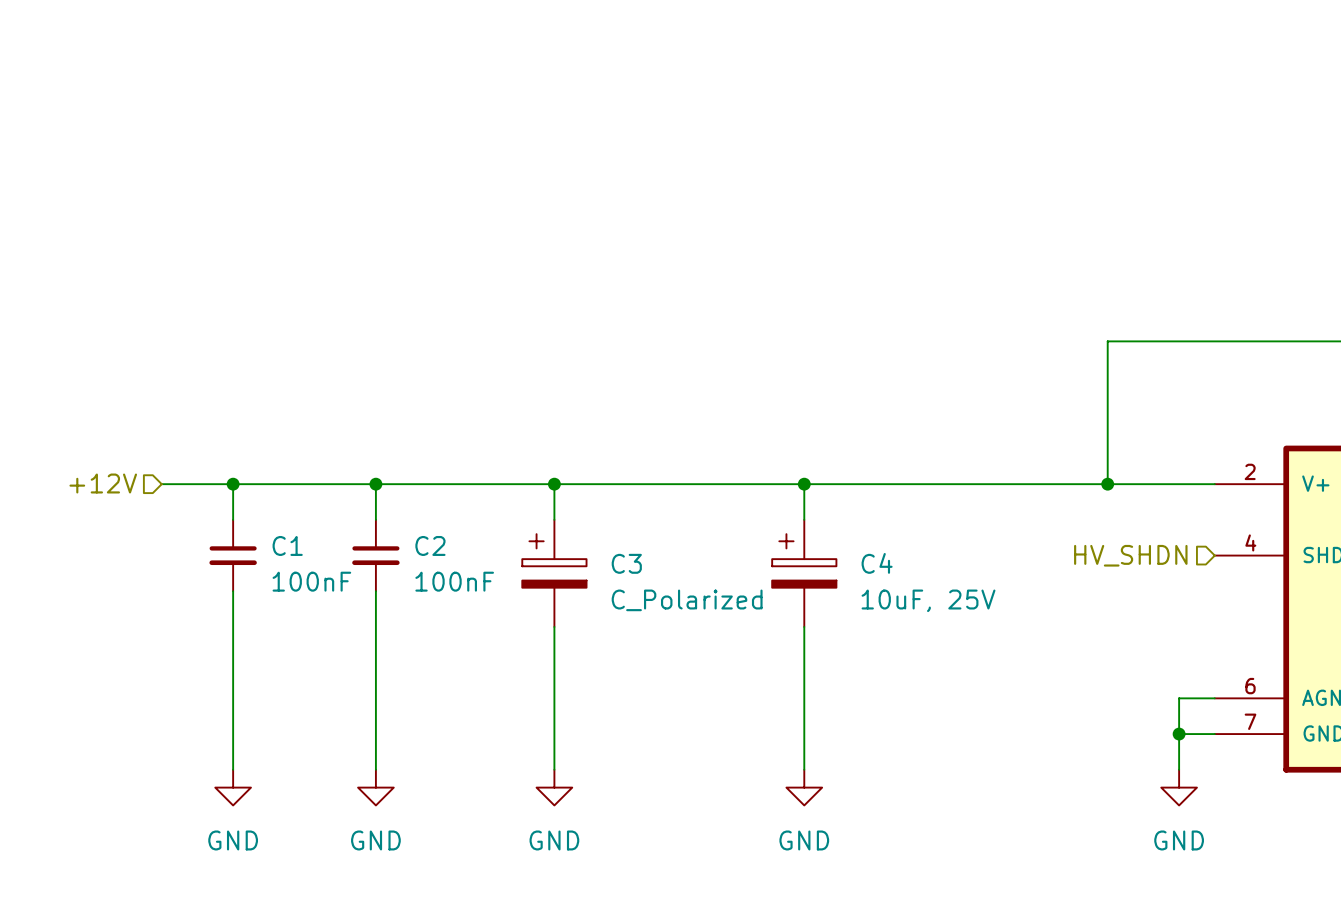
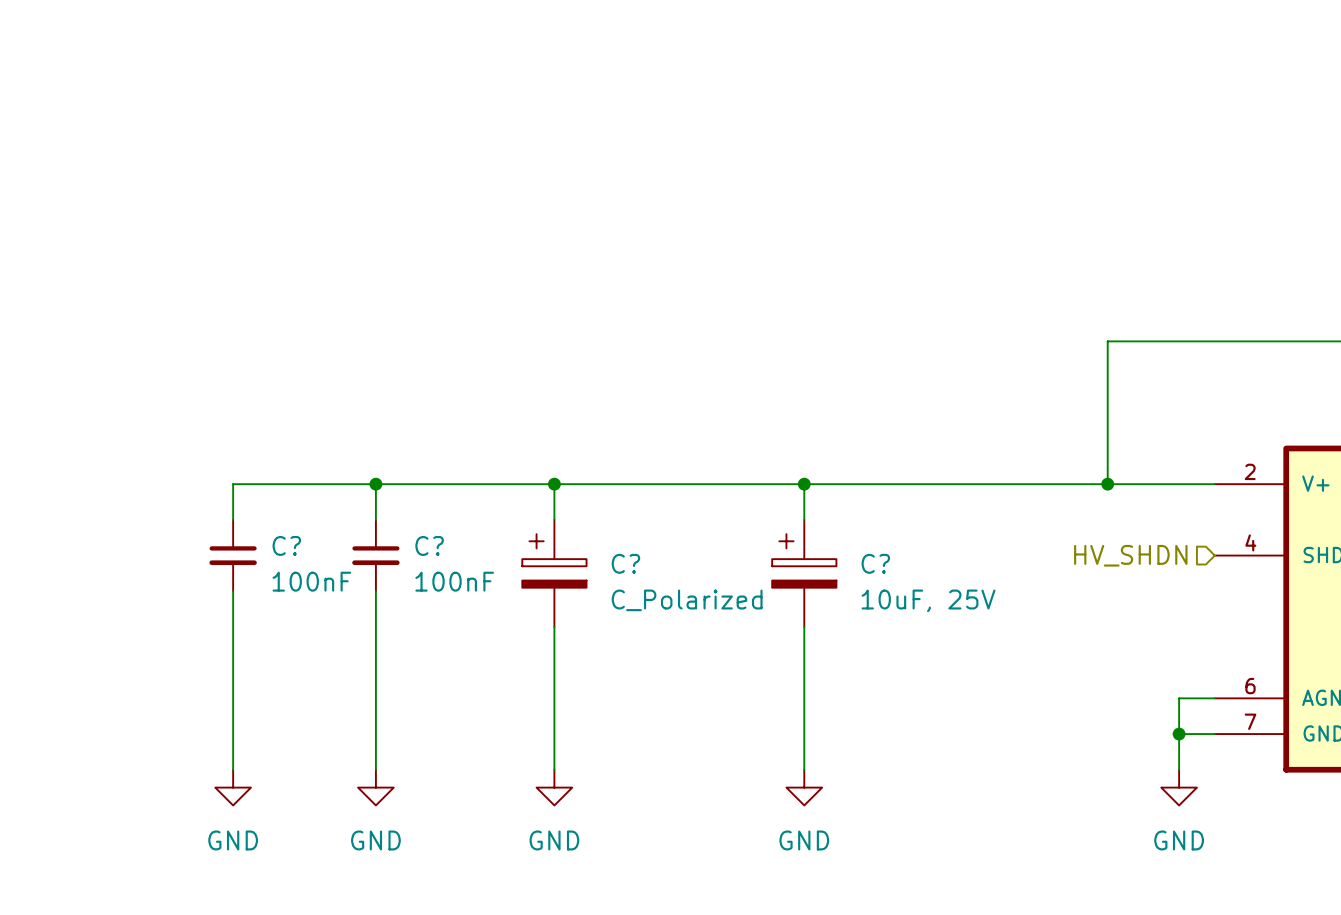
hierarchical label: +12V (103, 483) -> none
wire: (161, 484) (233, 484) -> none
junction: (233, 484) -> none
C1 name: C1 (287, 545) -> C? (286, 545)
C2 name: C2 (430, 545) -> C? (429, 545)
C3 name: C3 (626, 563) -> C? (625, 563)
C4 name: C4 (877, 563) -> C? (875, 563)

